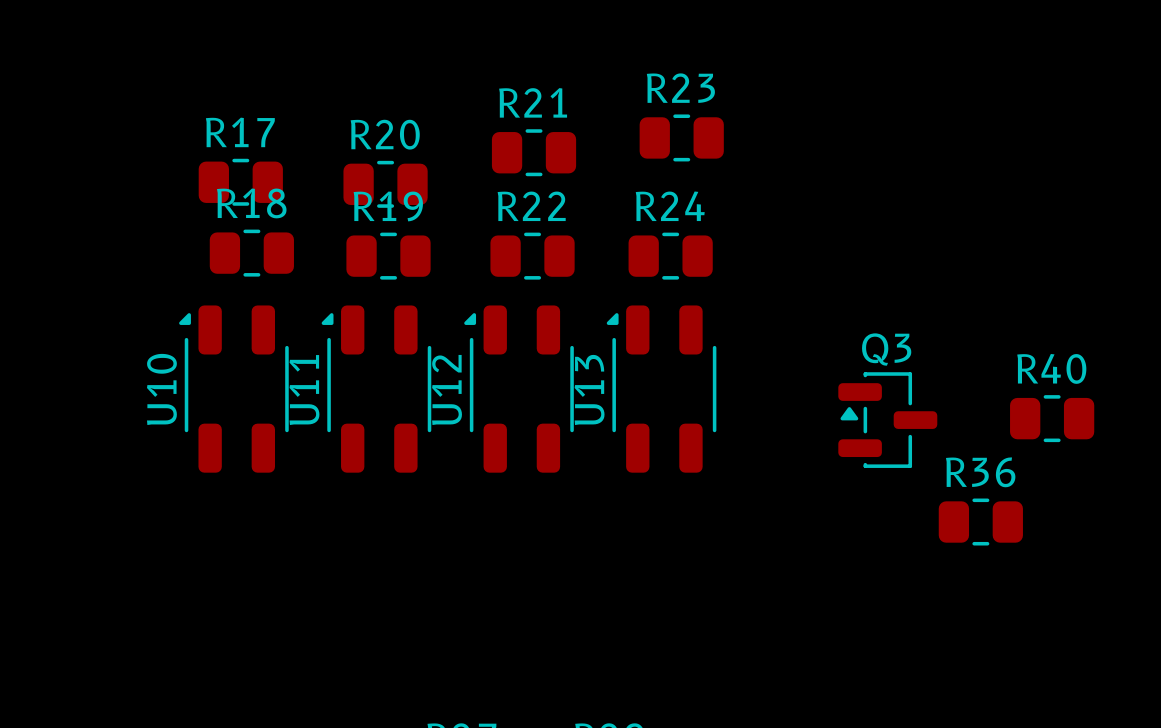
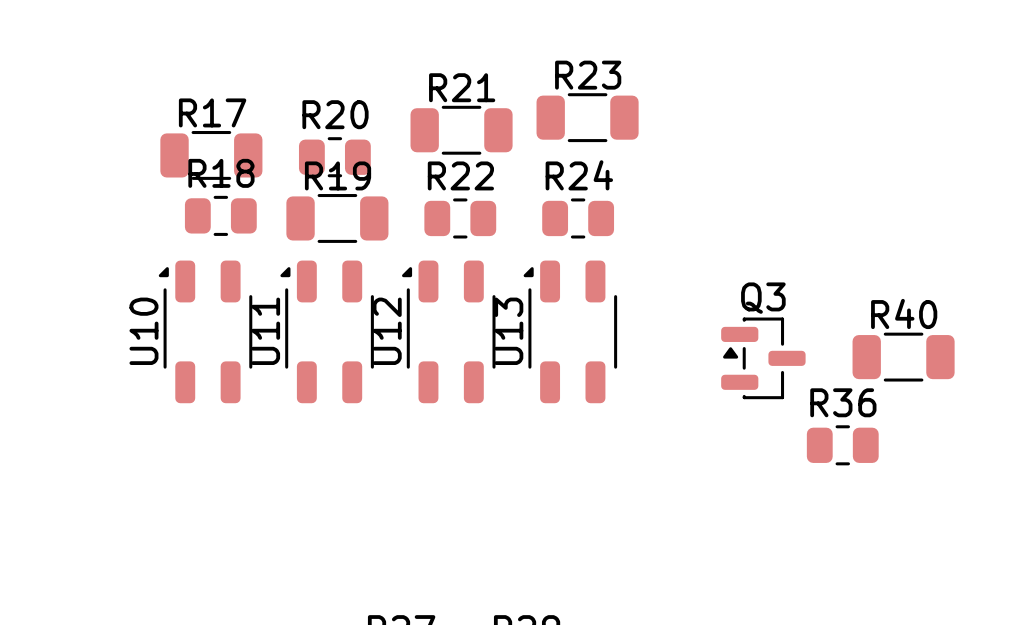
R23 footprint: [639, 114, 724, 162] -> [536, 93, 639, 143]
R21 footprint: [491, 129, 577, 177] -> [410, 105, 513, 155]
R17 footprint: [198, 158, 283, 206] -> [160, 131, 263, 180]
R19 footprint: [346, 232, 431, 280] -> [286, 194, 389, 243]
R40 footprint: [1010, 395, 1095, 443] -> [852, 332, 955, 382]

